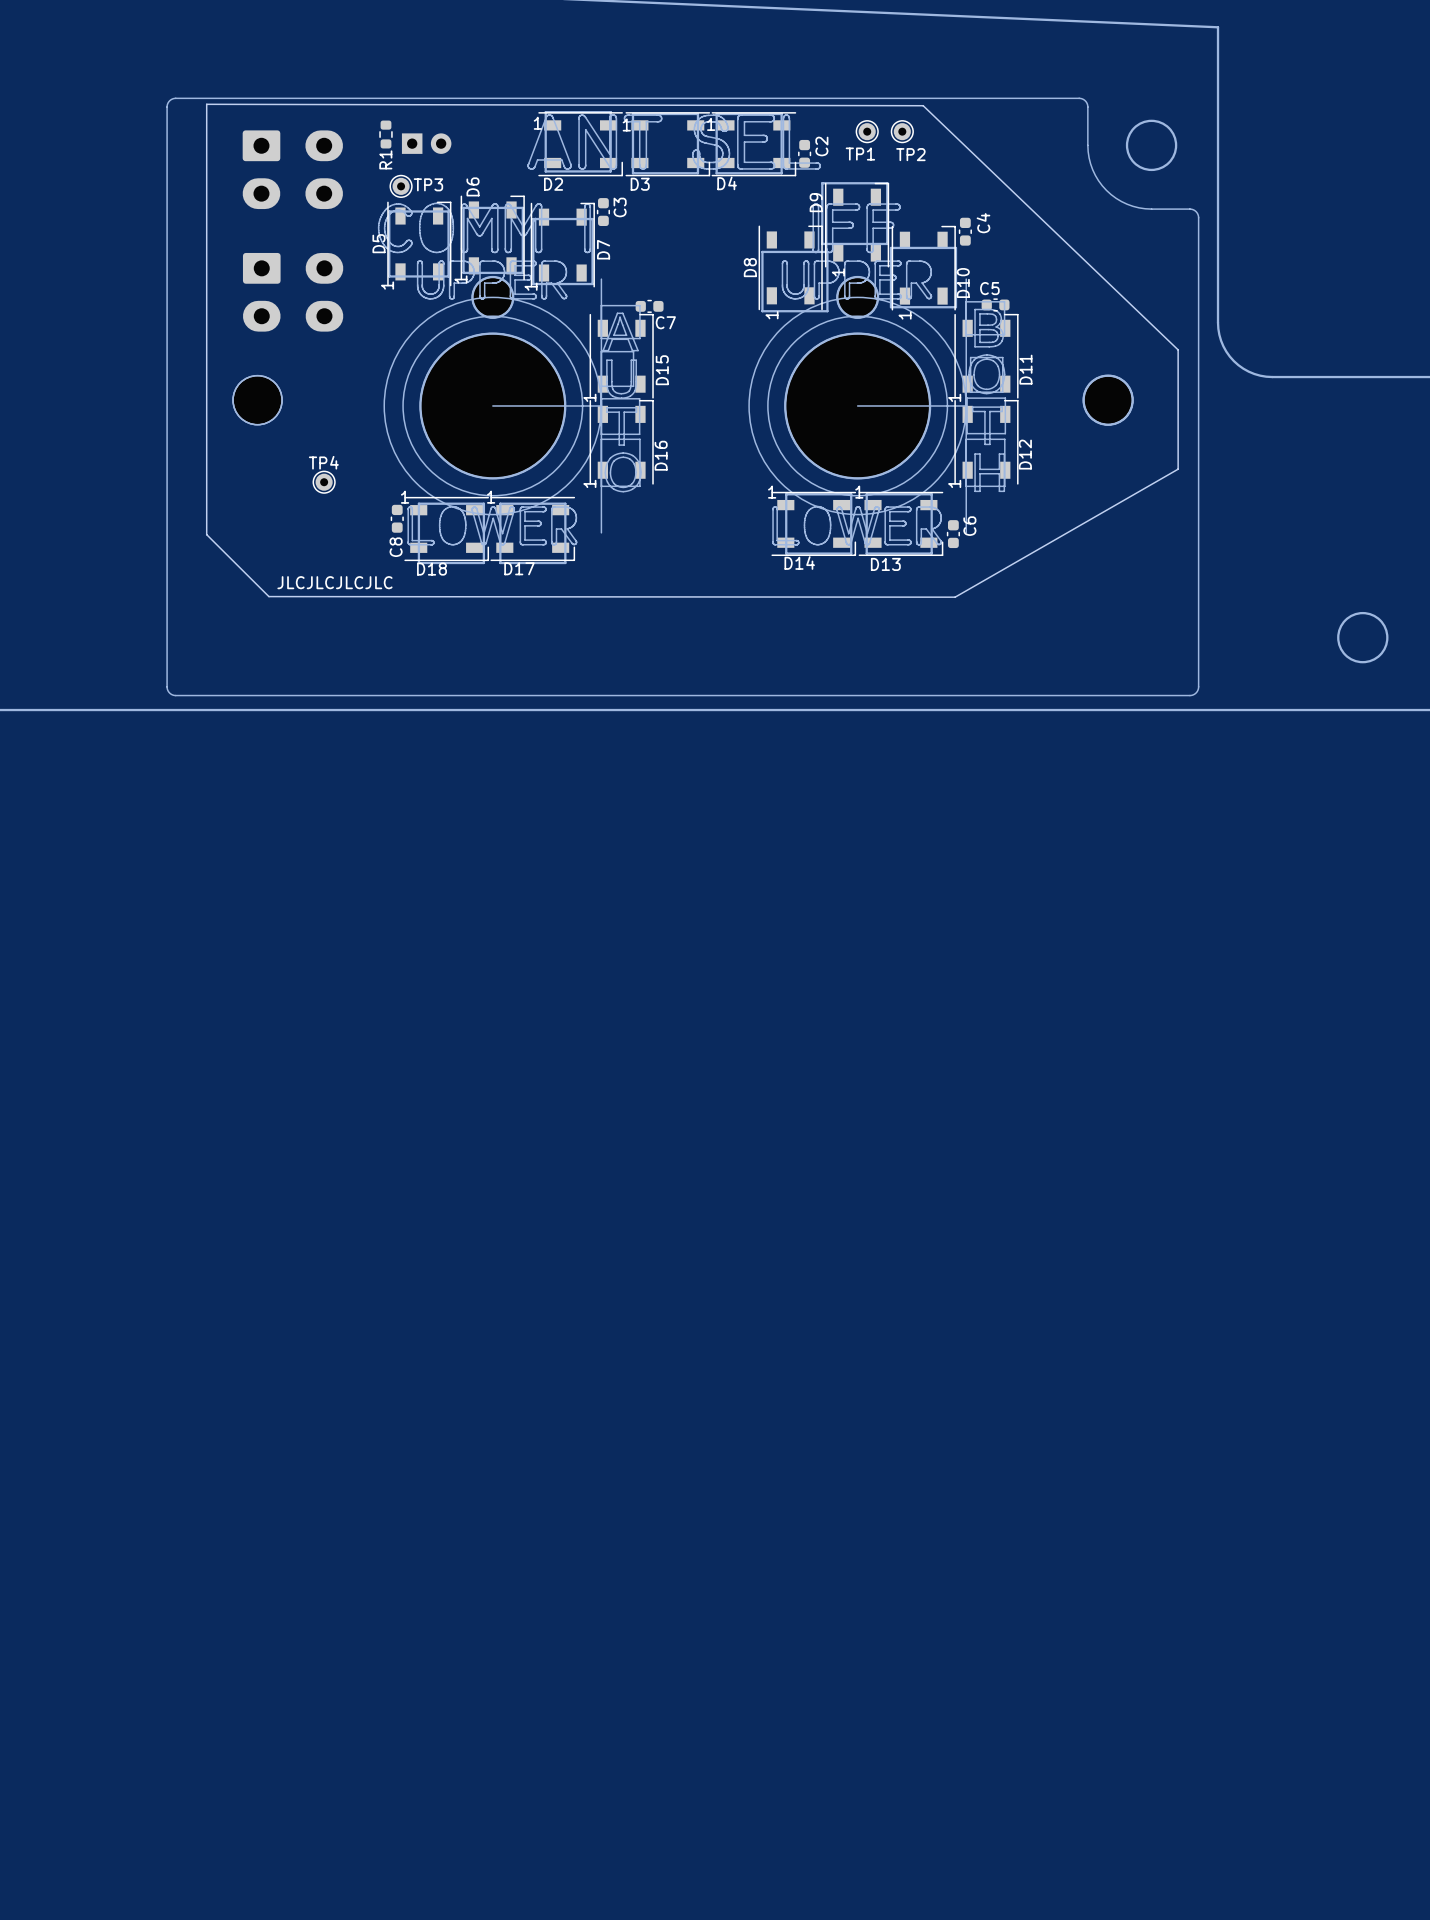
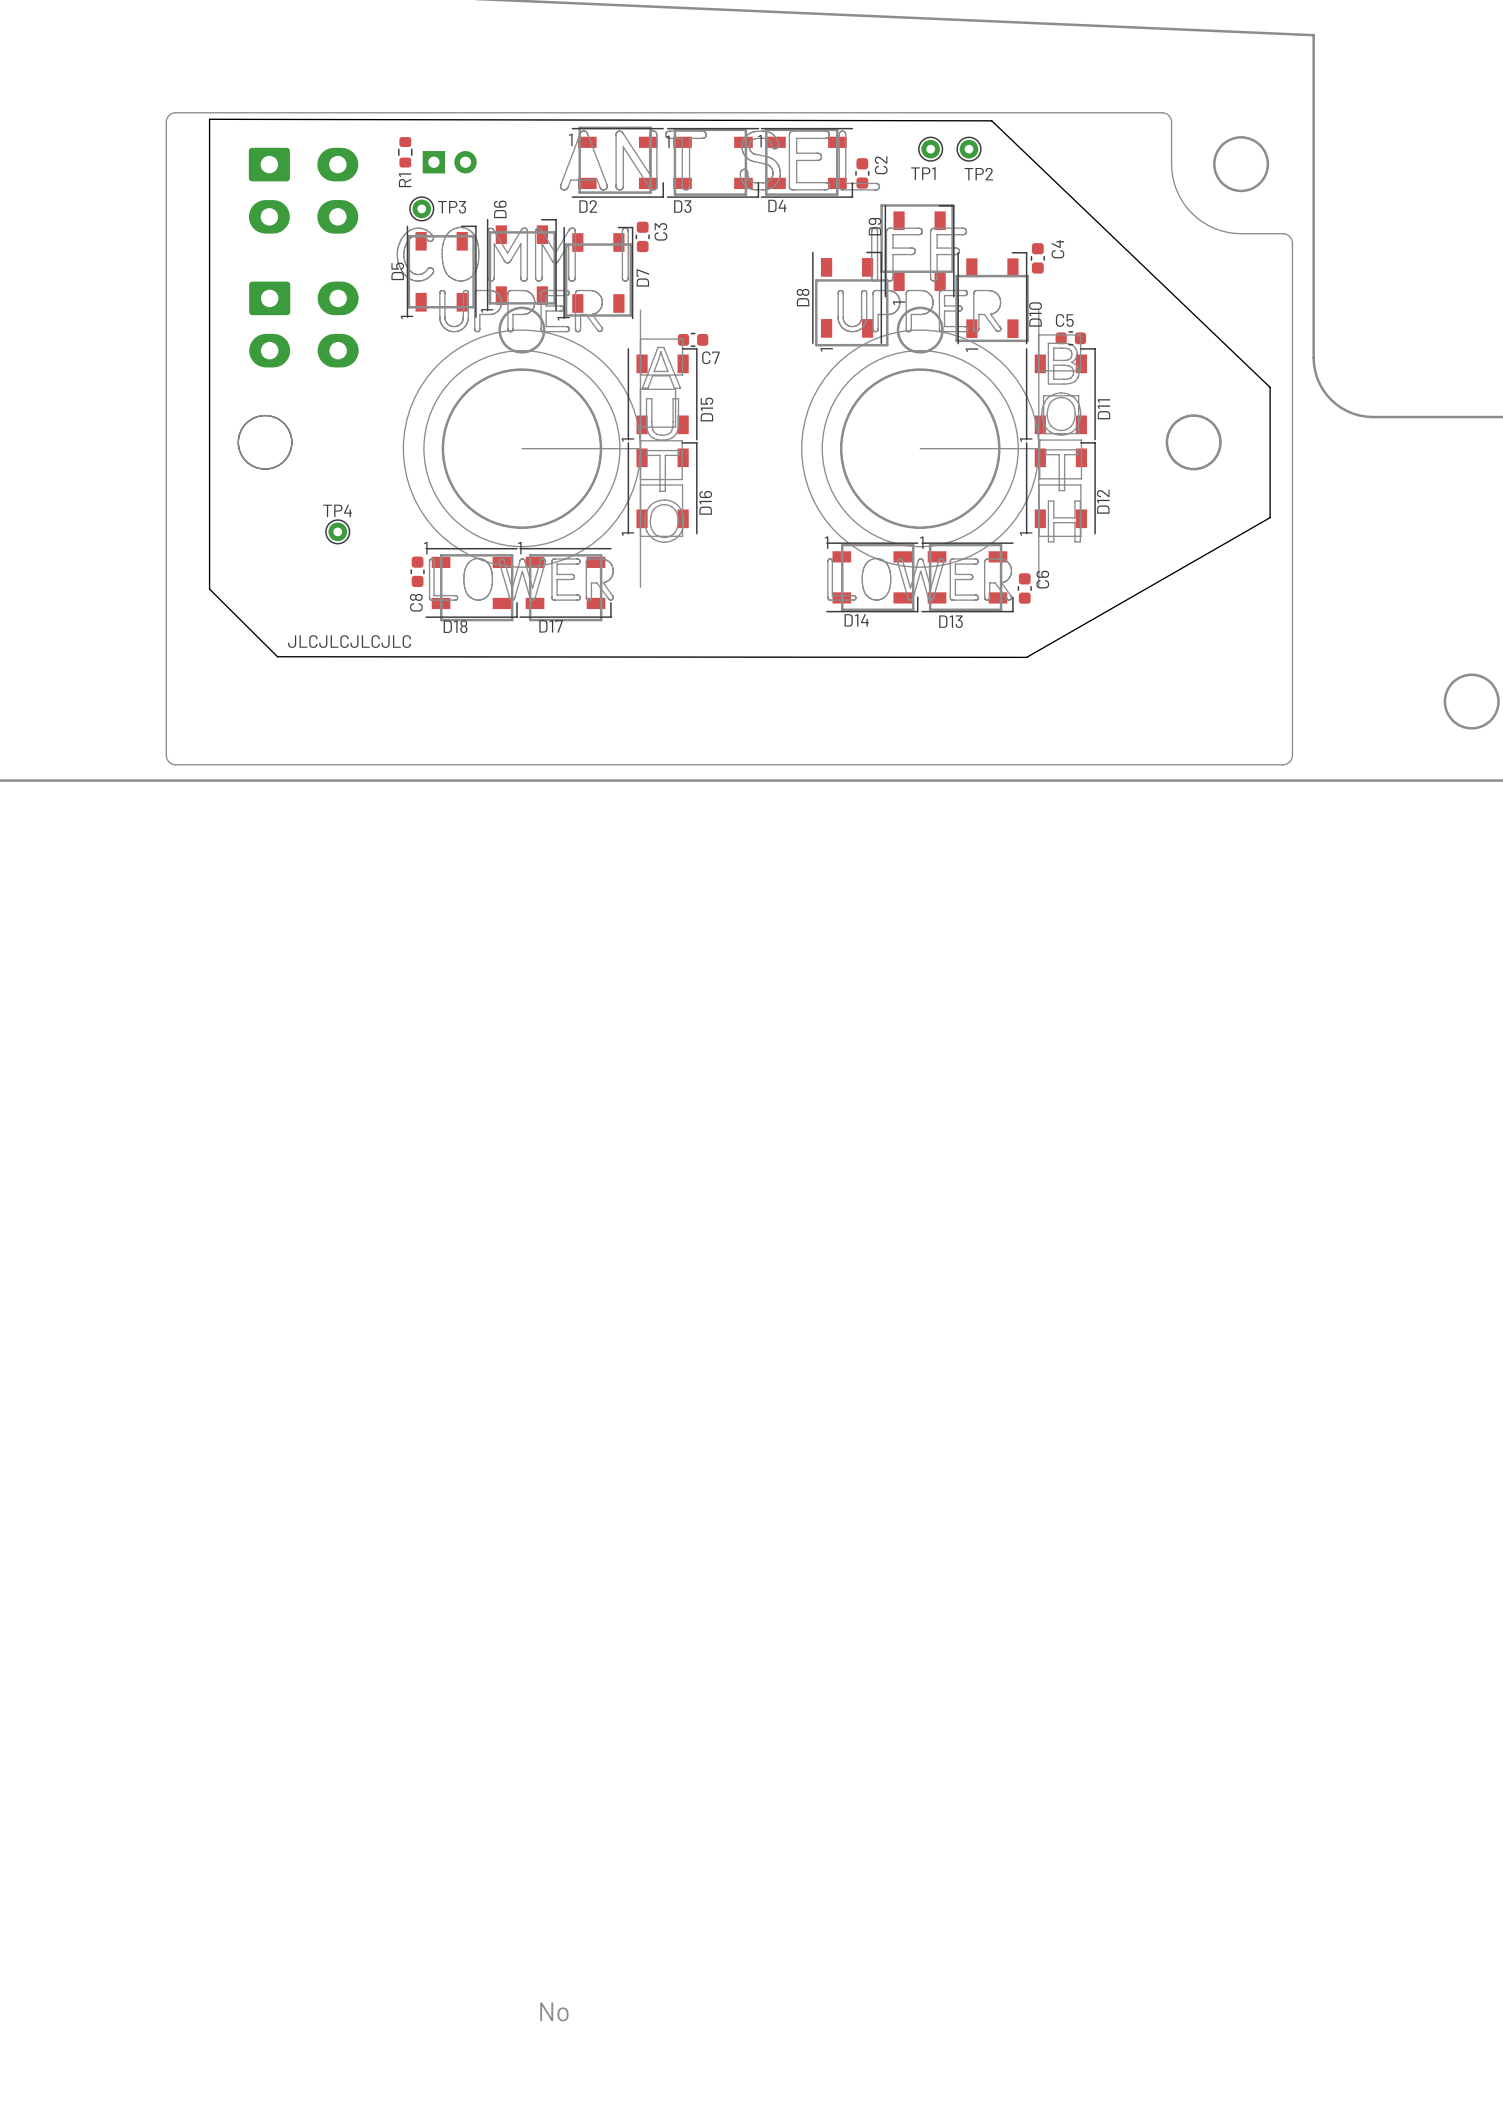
text: none -> No (554, 2011)

